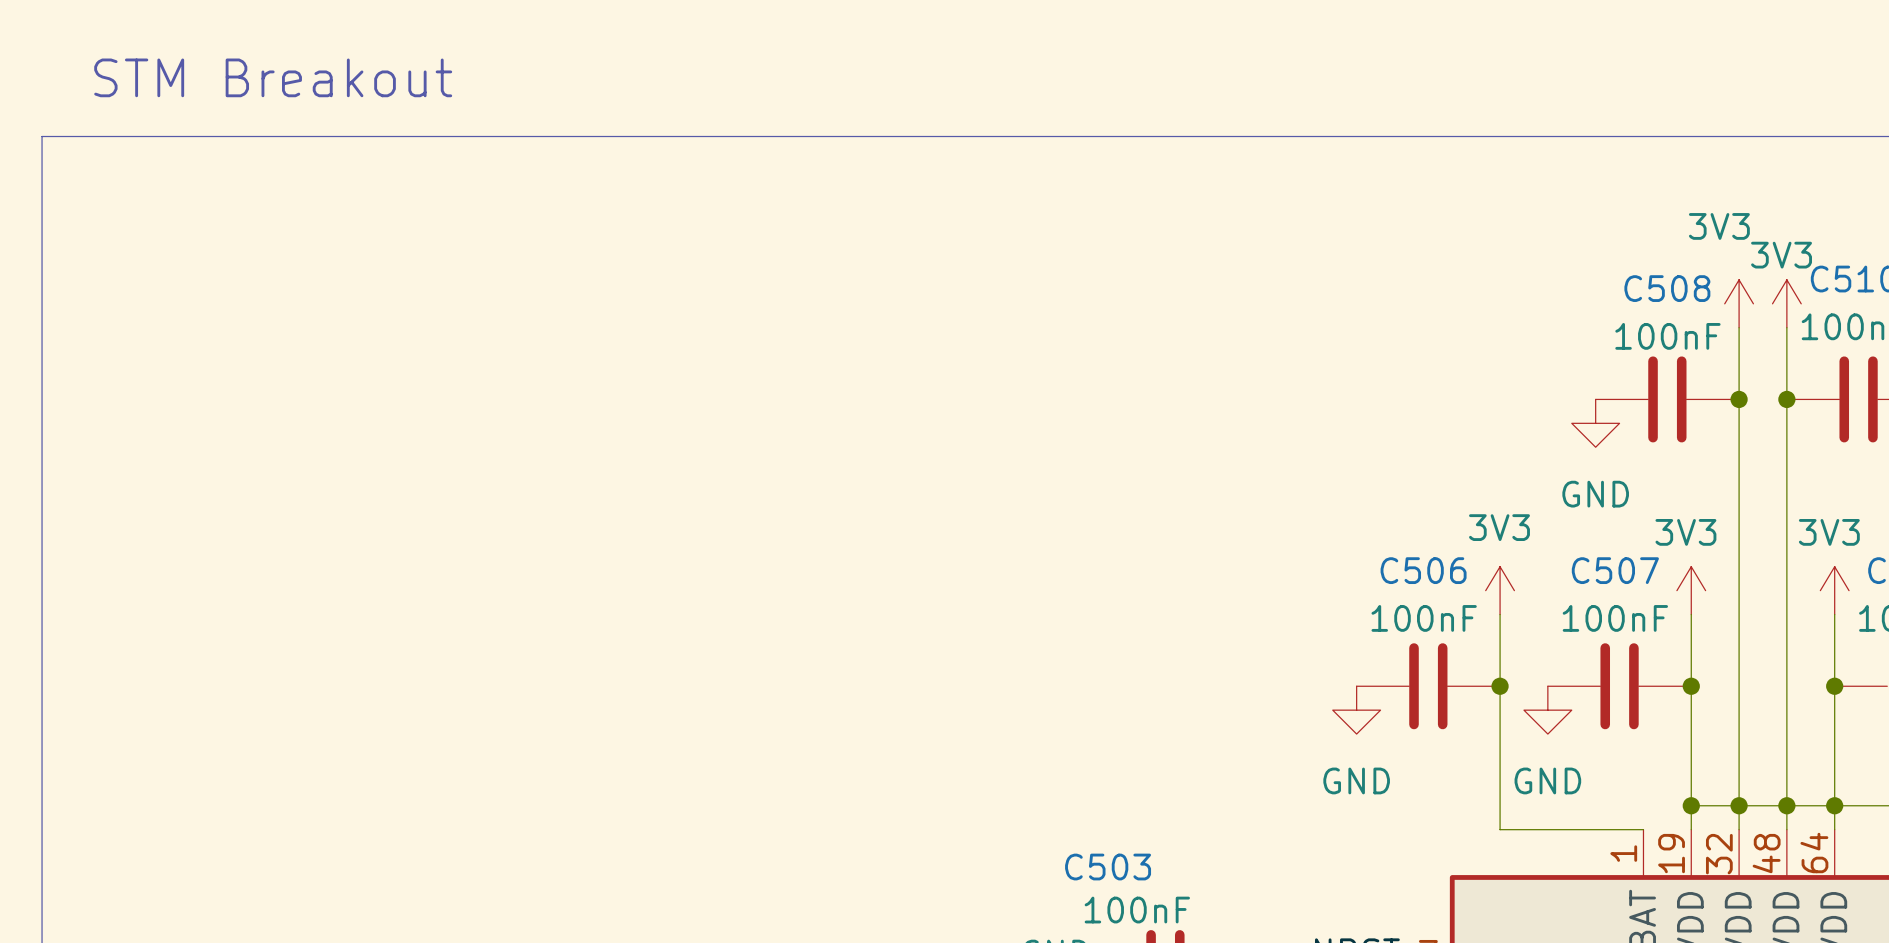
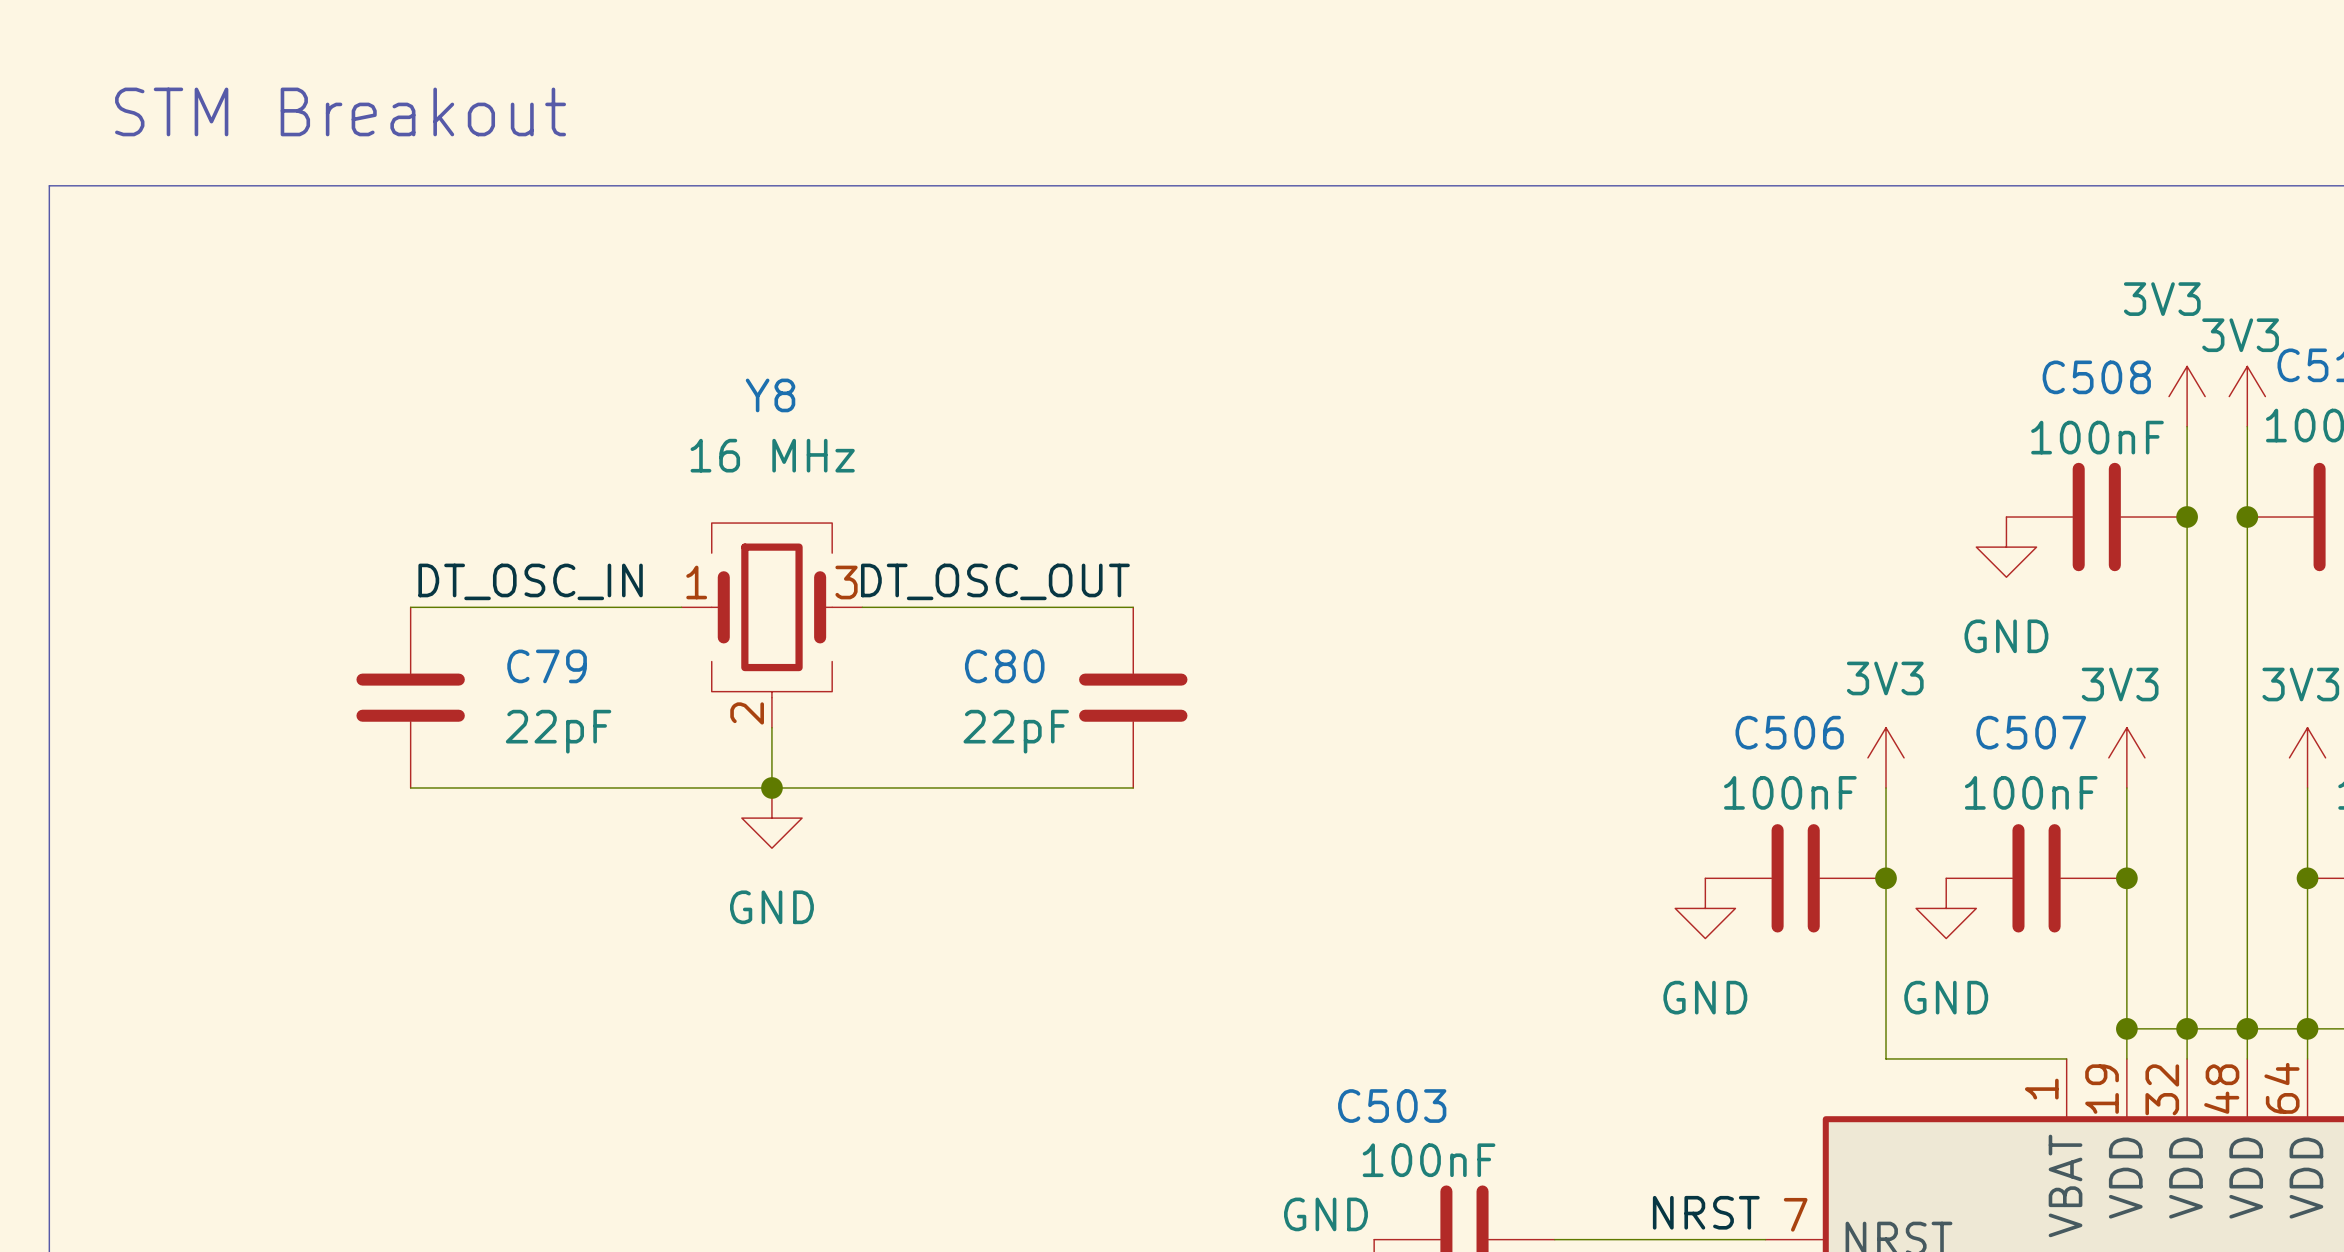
label: none -> DT_OSC_IN (530, 581)
label: none -> DT_OSC_OUT (995, 581)
wire: none -> (410, 607) (681, 607)
wire: none -> (862, 607) (1133, 607)
Y8: none -> 16 MHz (771, 625)
C79: none -> 22pF (410, 697)
C80: none -> 22pF (1133, 697)
wire: none -> (771, 727) (771, 787)
wire: none -> (410, 787) (1133, 787)
junction: none -> (771, 787)
power symbol: none -> GND (771, 818)

